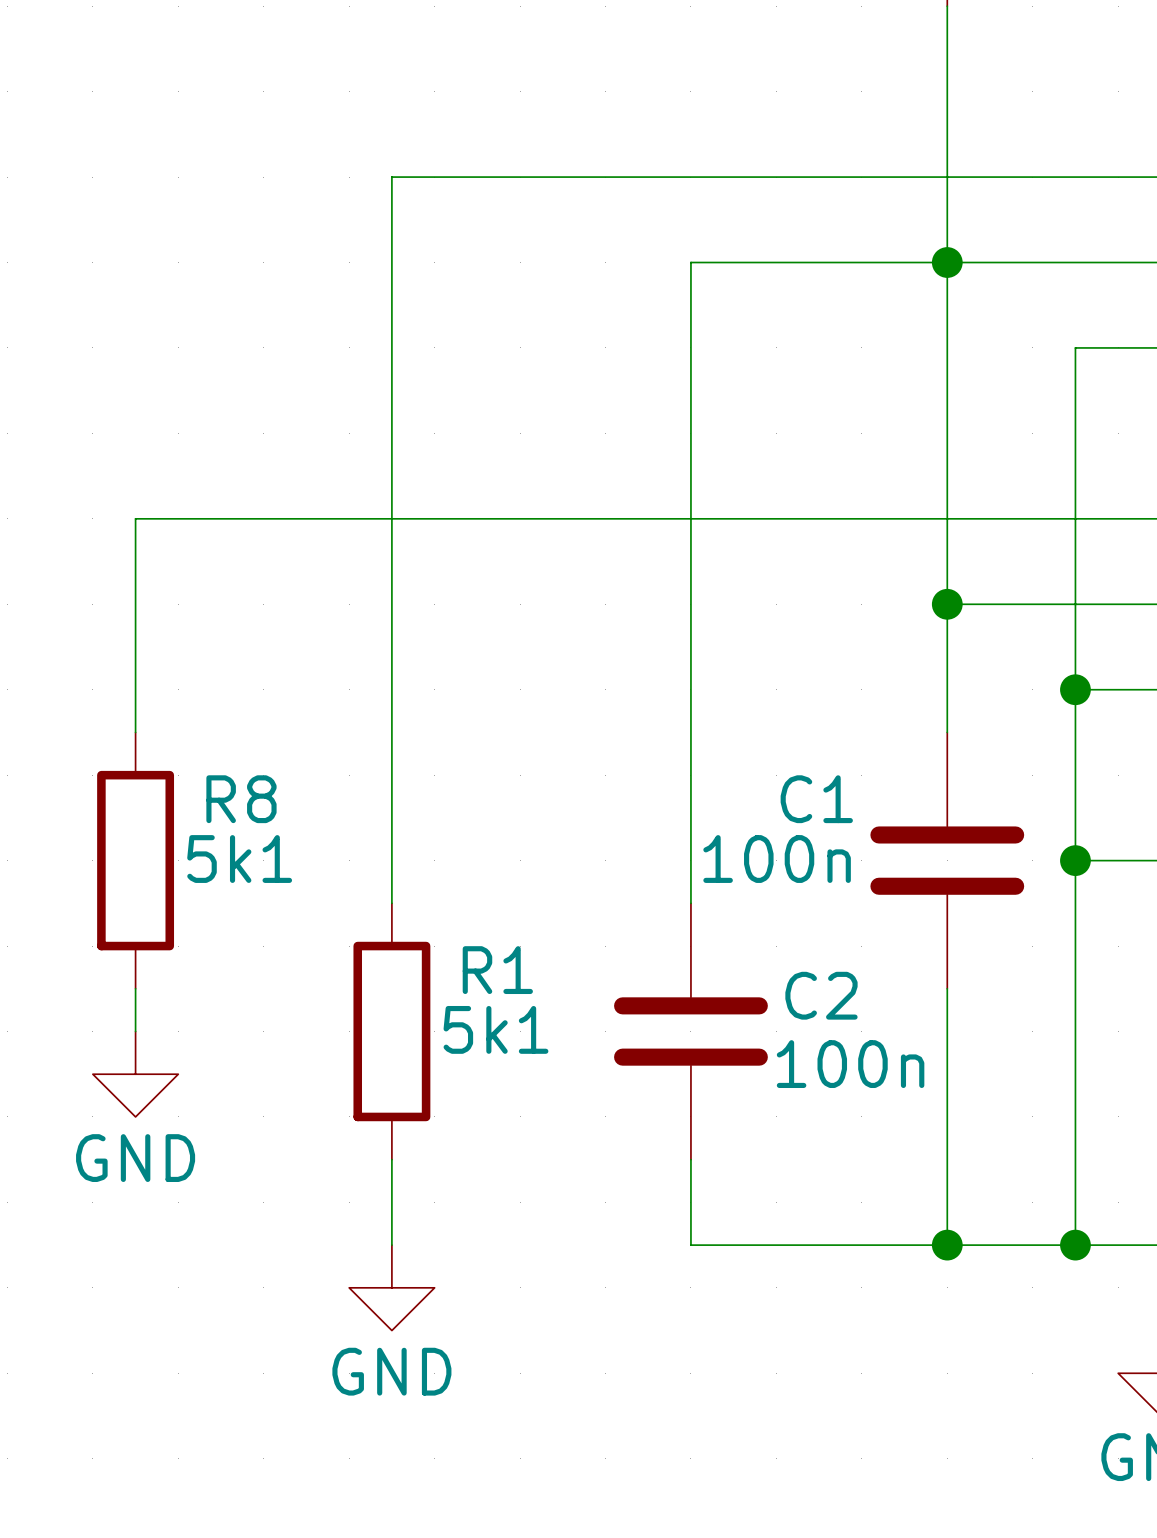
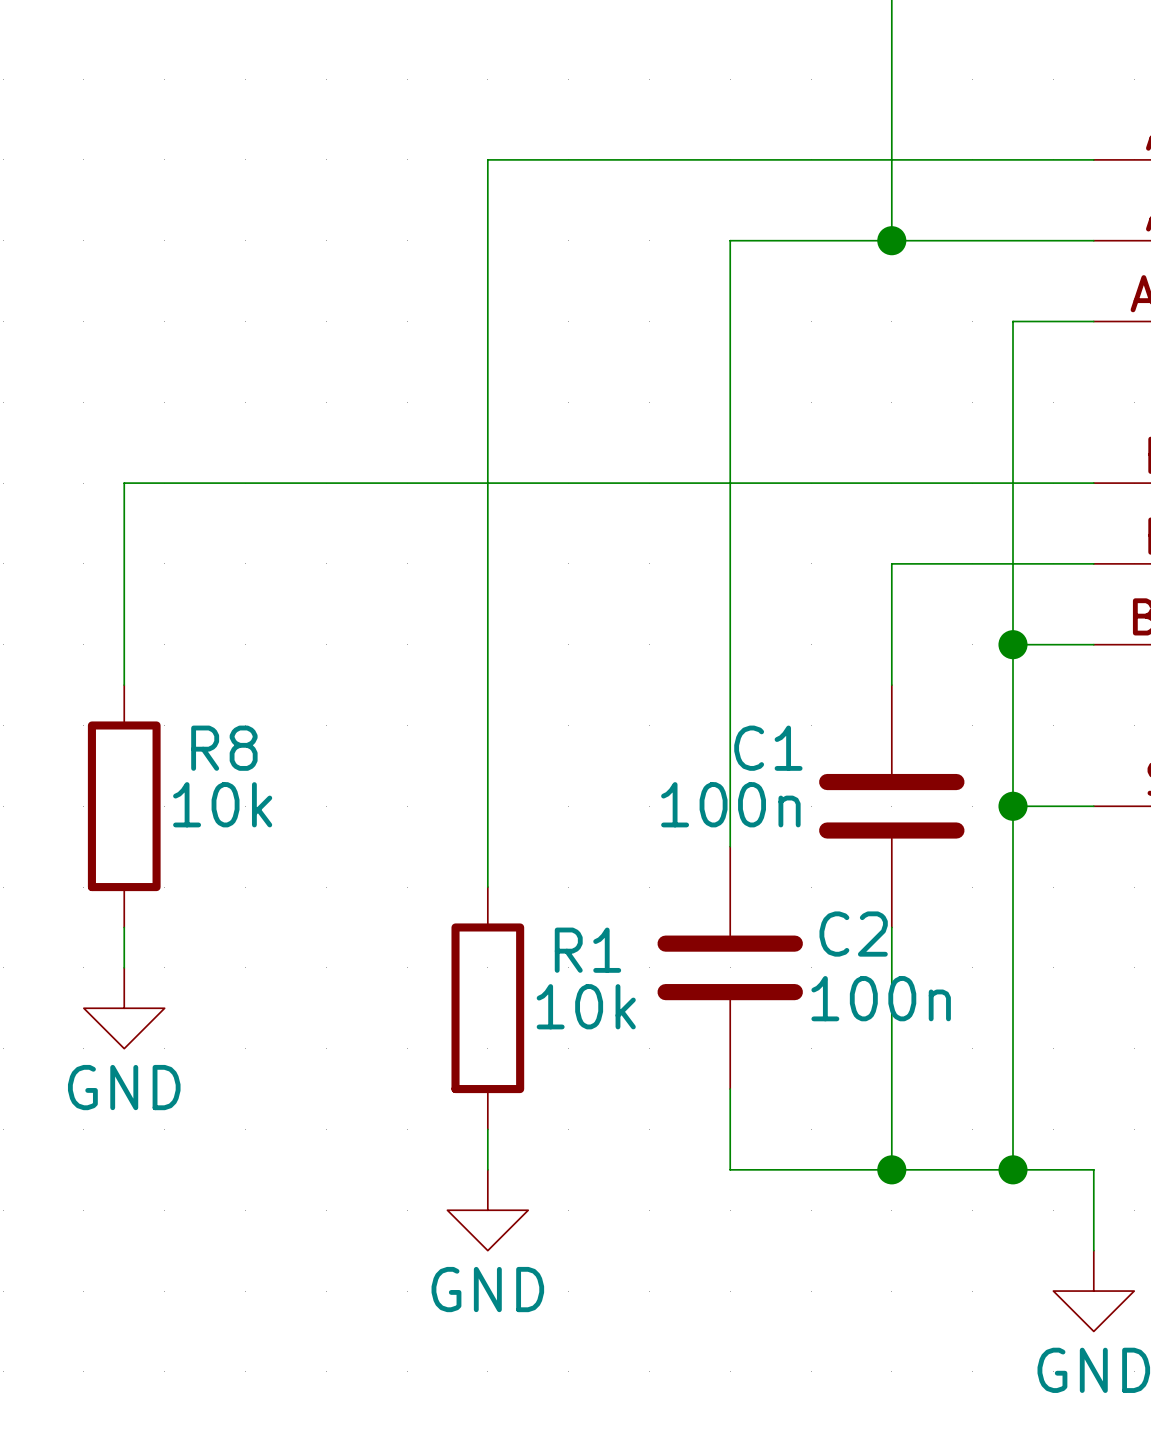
wire: (520, 177) (391, 177) (391, 903) -> (487, 159) (487, 887)
wire: (776, 262) (690, 262) (690, 903) -> (730, 240) (730, 846)
wire: (947, 262) (947, 604) -> none
junction: (947, 604) -> none
R8 value: 5k1 (239, 859) -> 10k (222, 804)
R1 value: 5k1 (495, 1029) -> 10k (586, 1006)
R1 position: (391, 1031) -> (487, 1008)
C2 position: (690, 1031) -> (730, 967)
wire: (391, 1159) (391, 1245) -> none
wire: (690, 1159) (690, 1245) (776, 1245) -> (730, 1089) (730, 1169)
wire: none -> (487, 1129) (487, 1169)
power symbol position: GND (391, 1287) -> GND (487, 1210)

